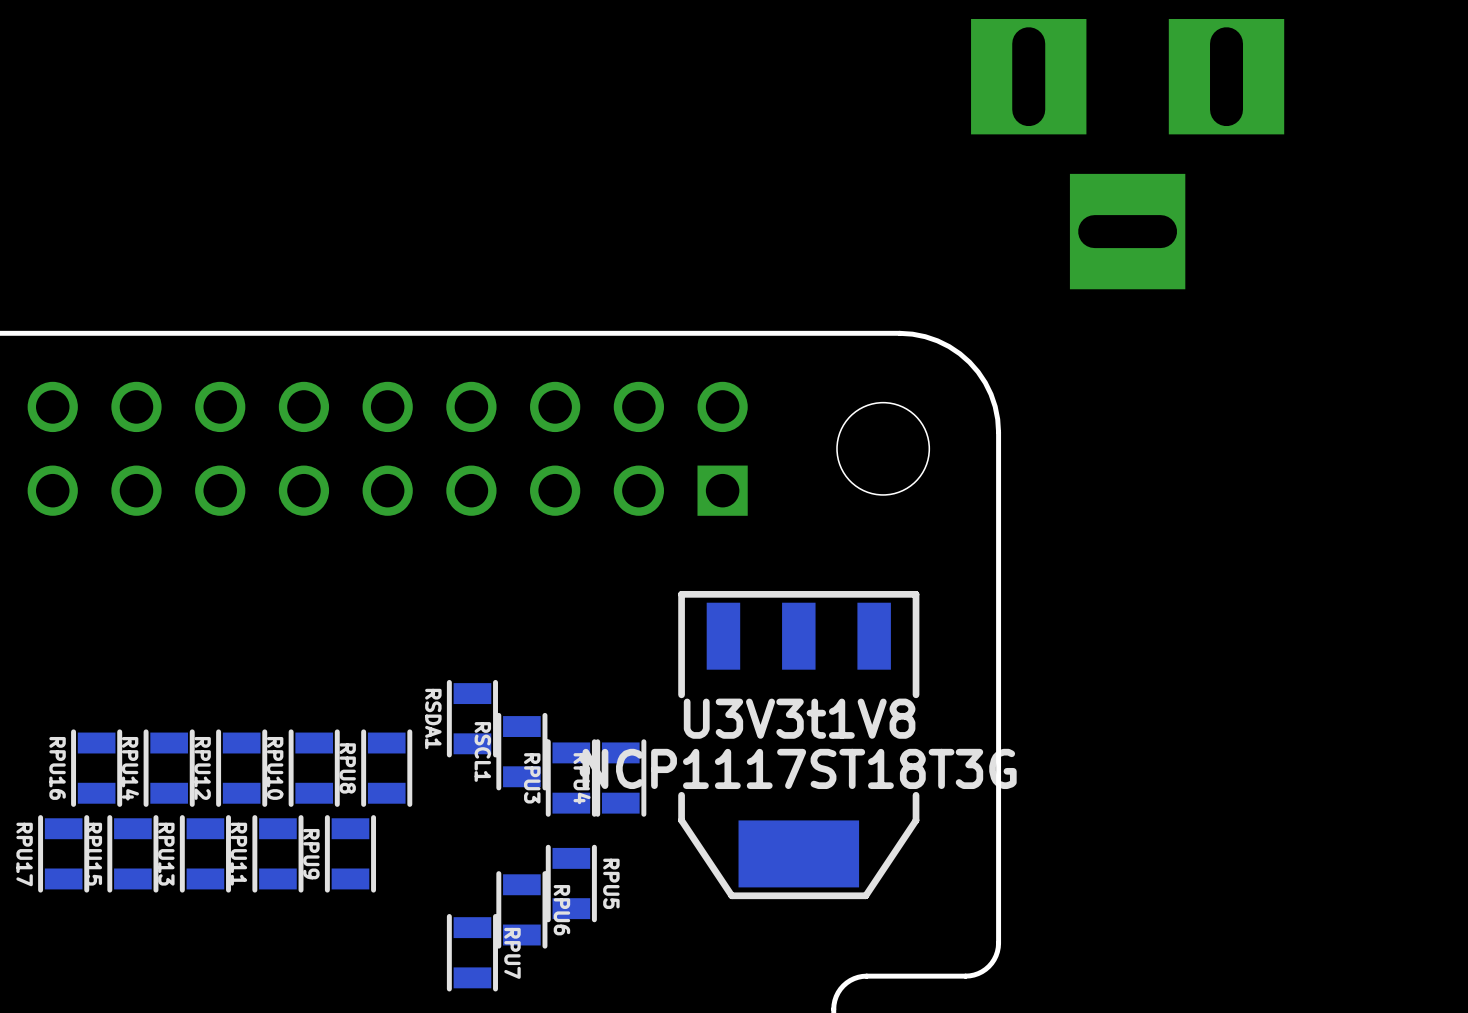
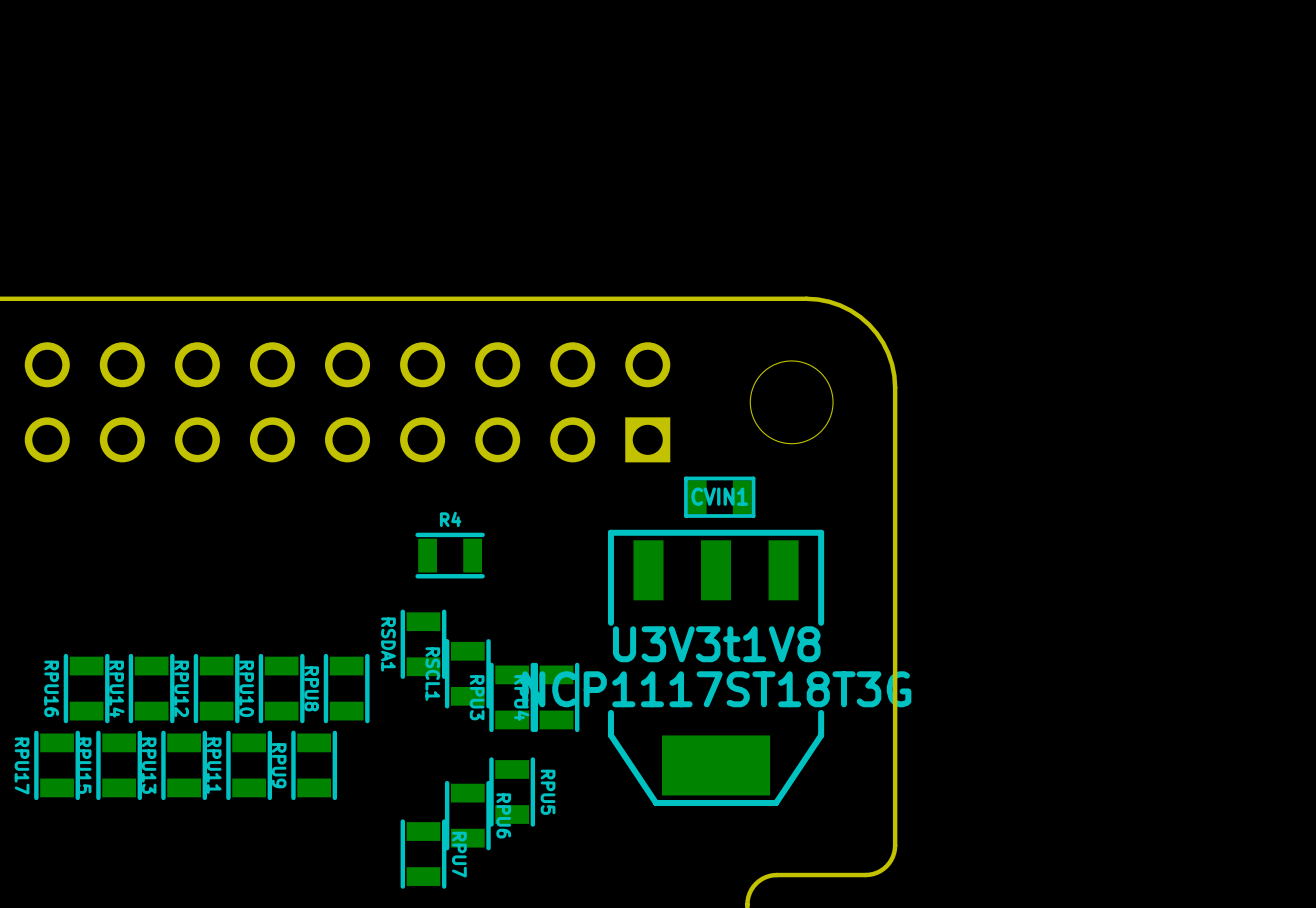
part: (1127, 154) -> none
CVIN1: none -> (719, 497)
R4: none -> (450, 555)

